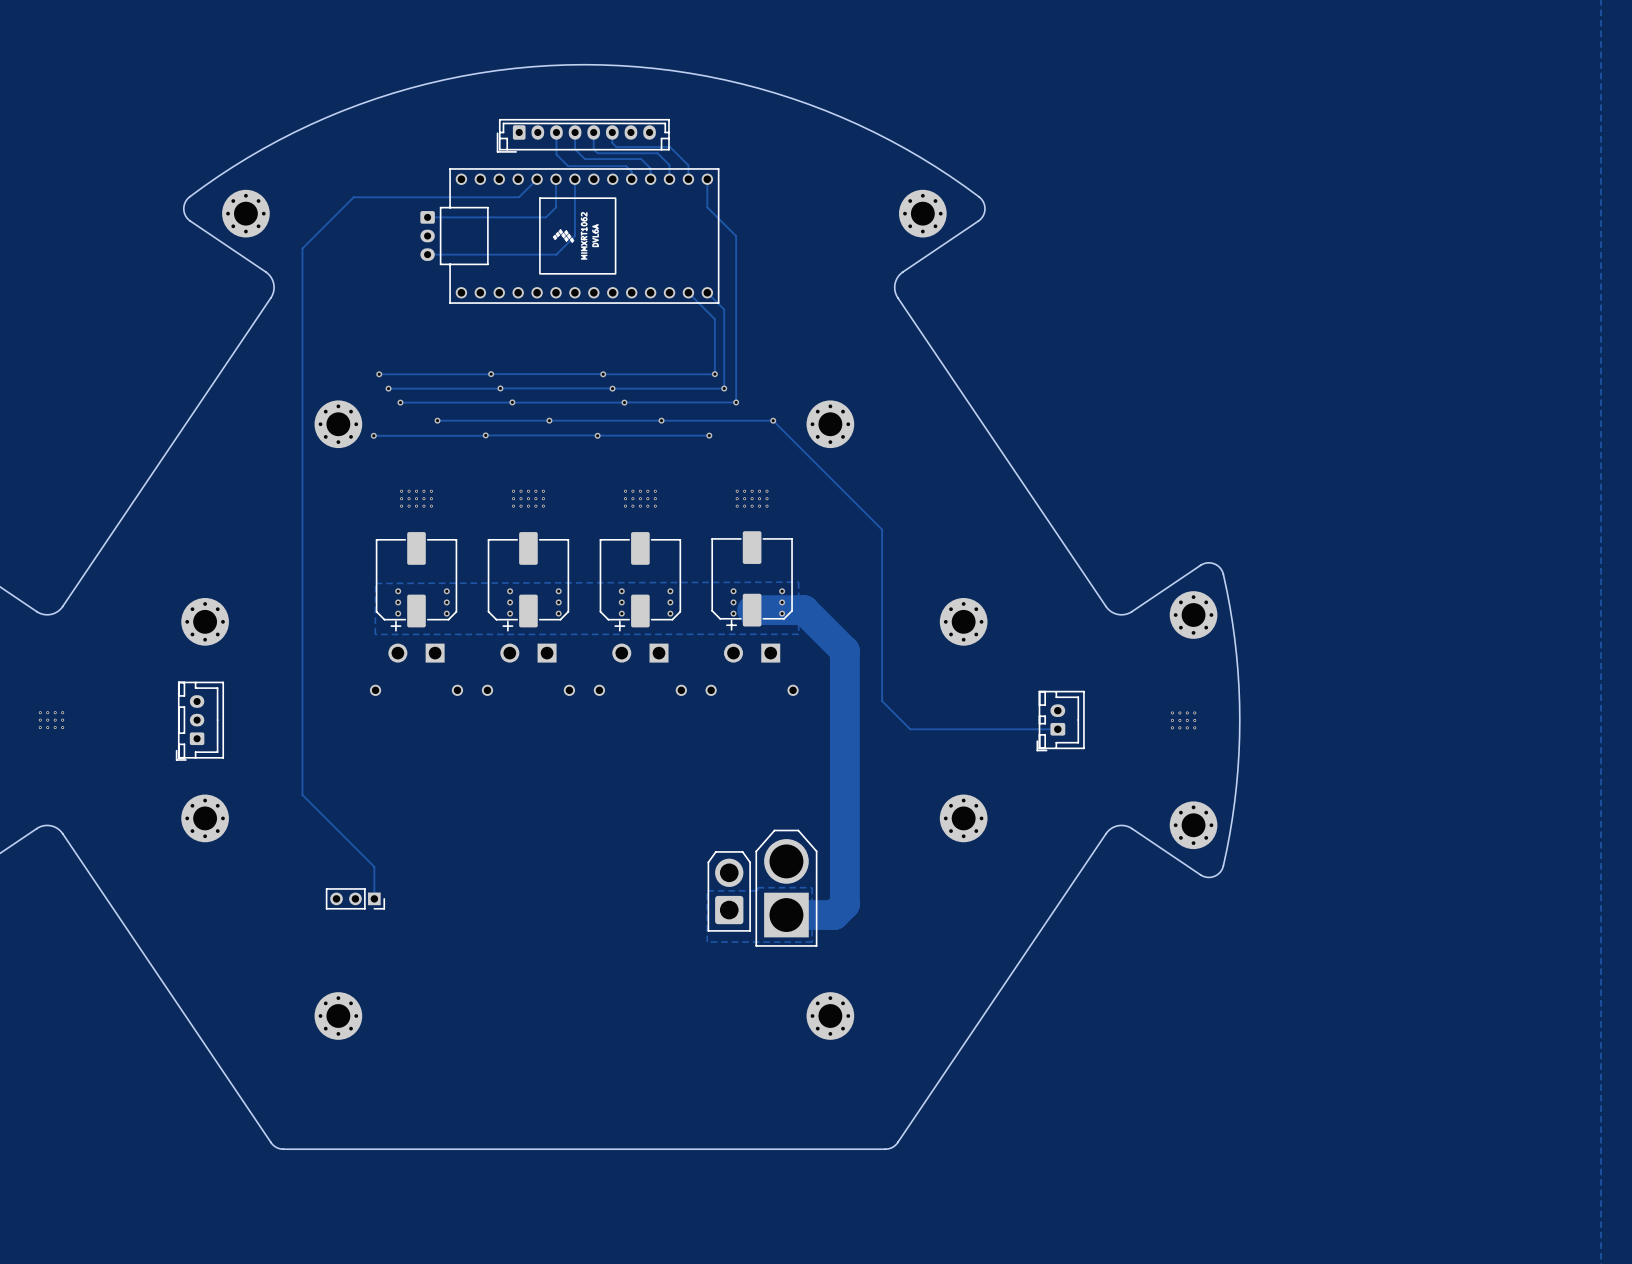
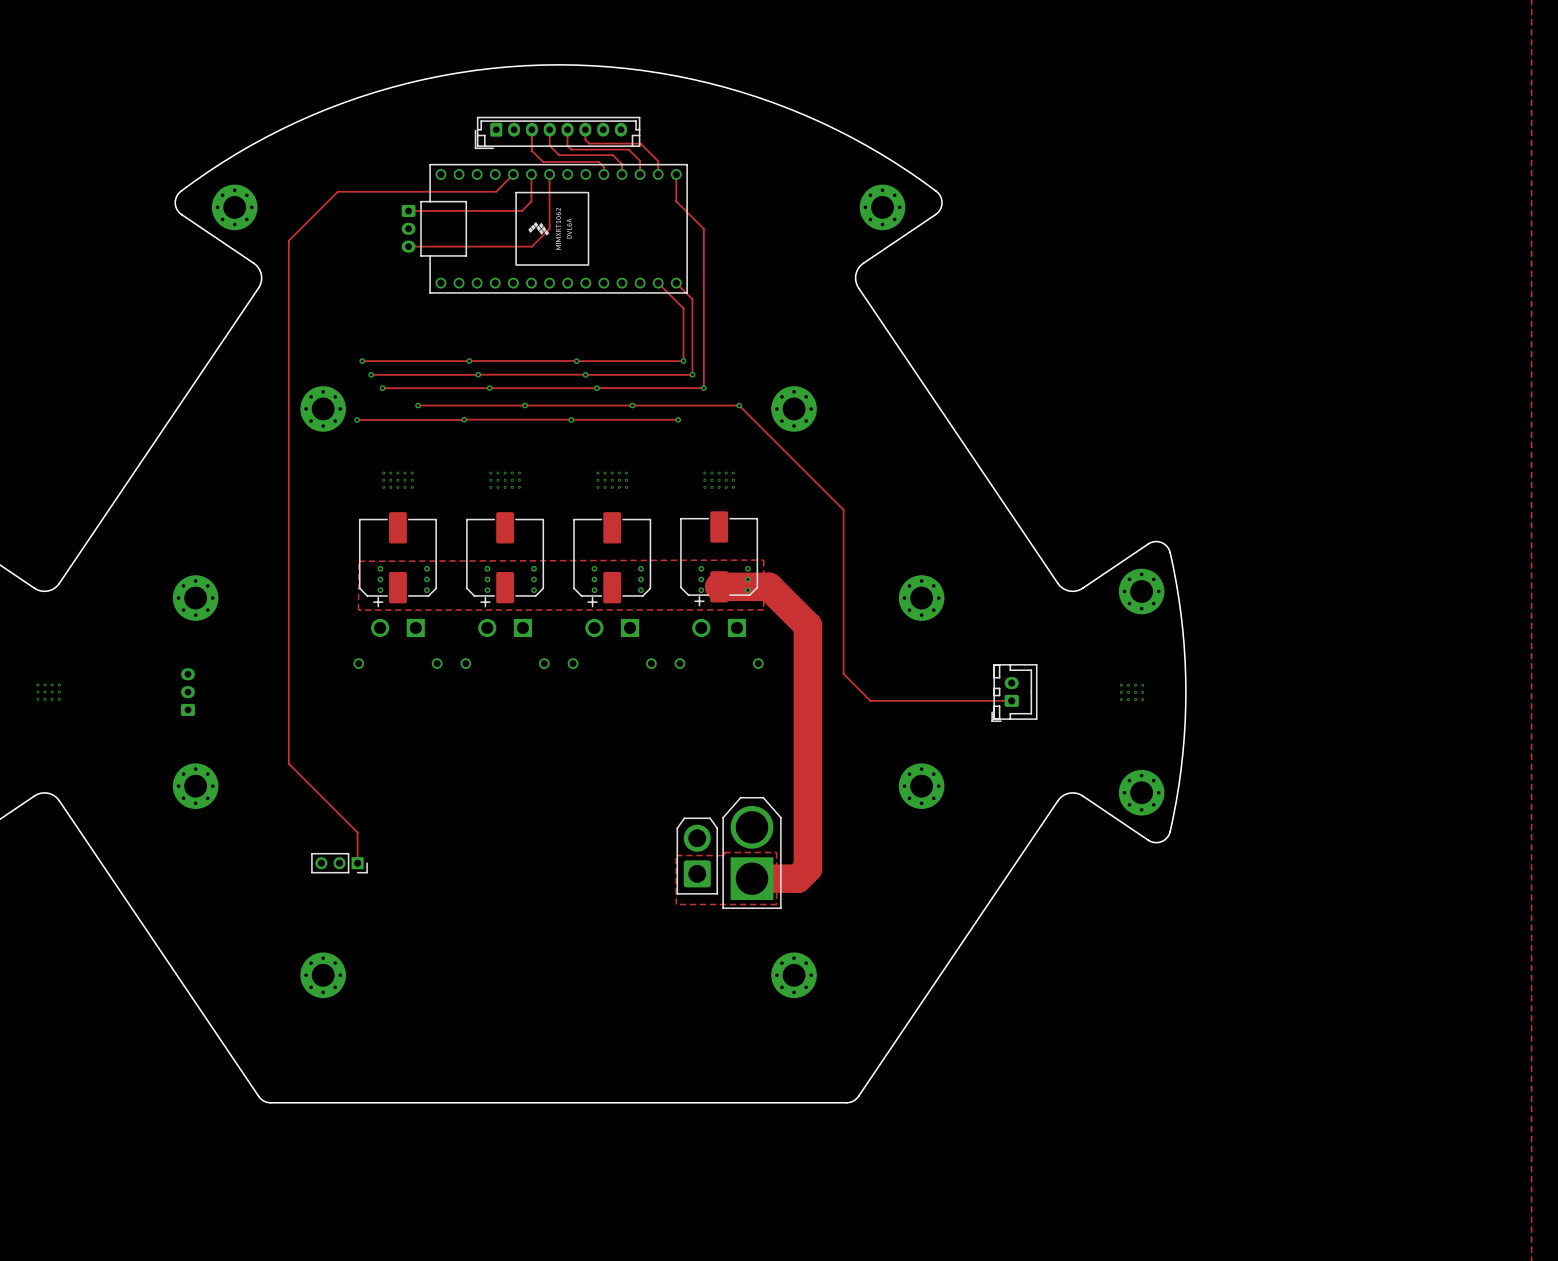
part side: top (199, 721) -> bottom (187, 692)

